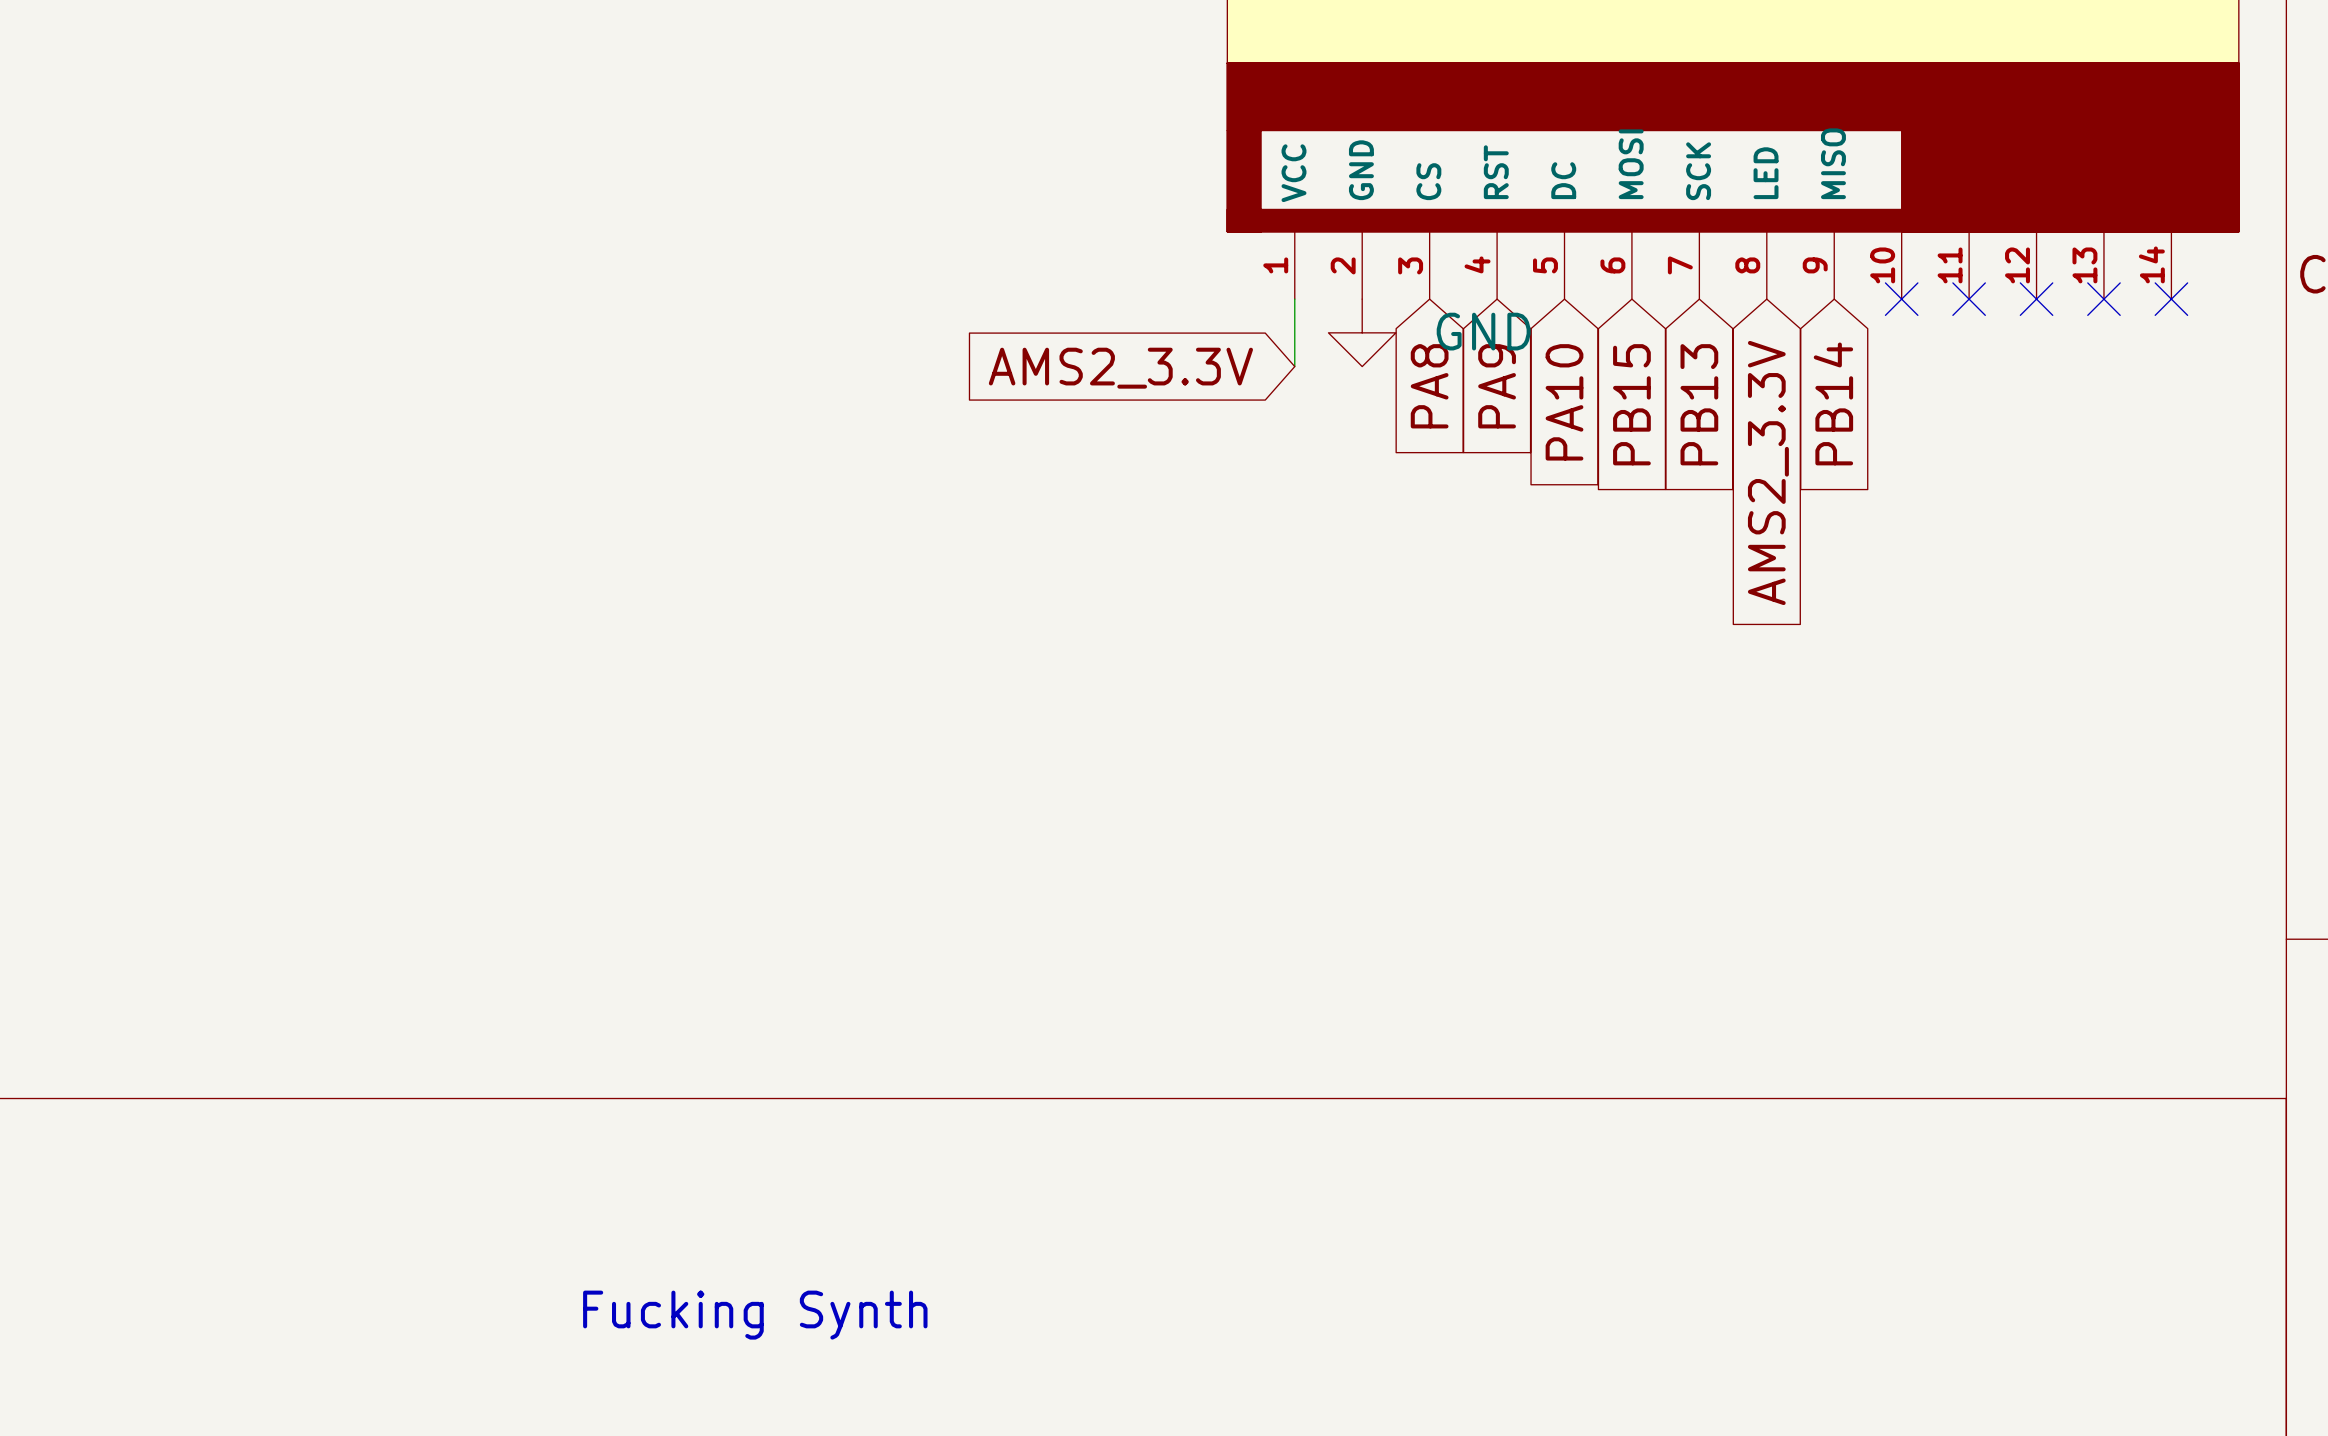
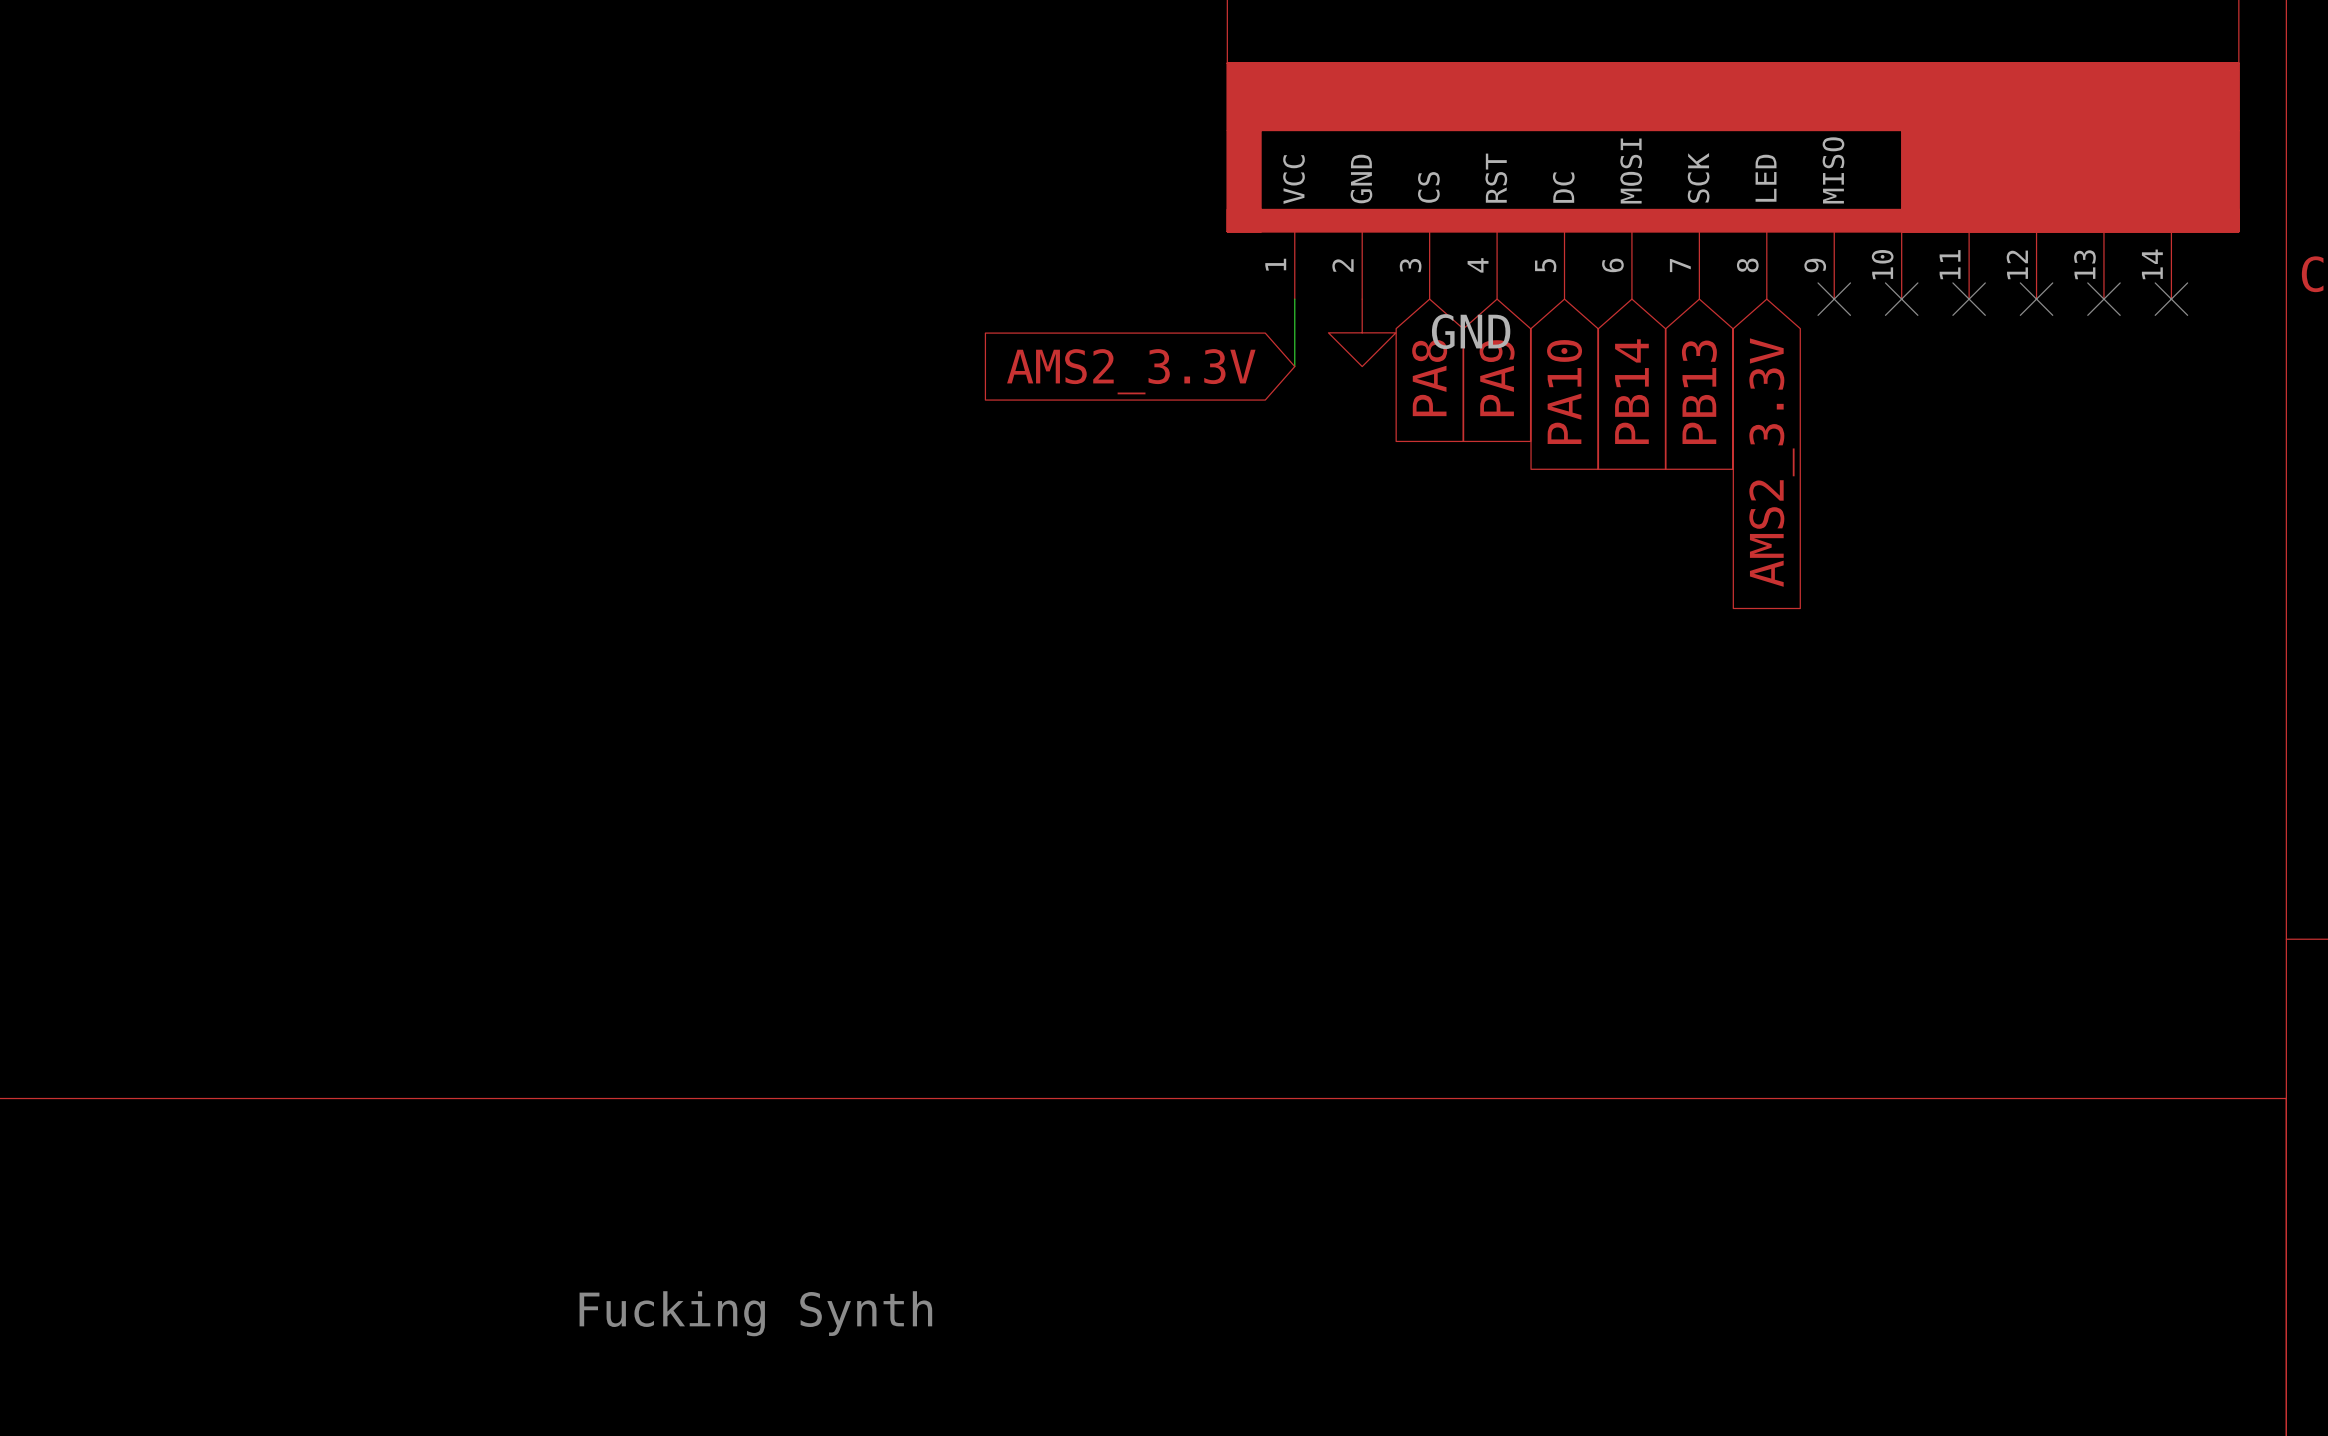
no-connect mark: none -> (1834, 299)
global label: PB14 (1833, 403) -> none
global label: PB15 (1631, 404) -> PB14 (1631, 391)

